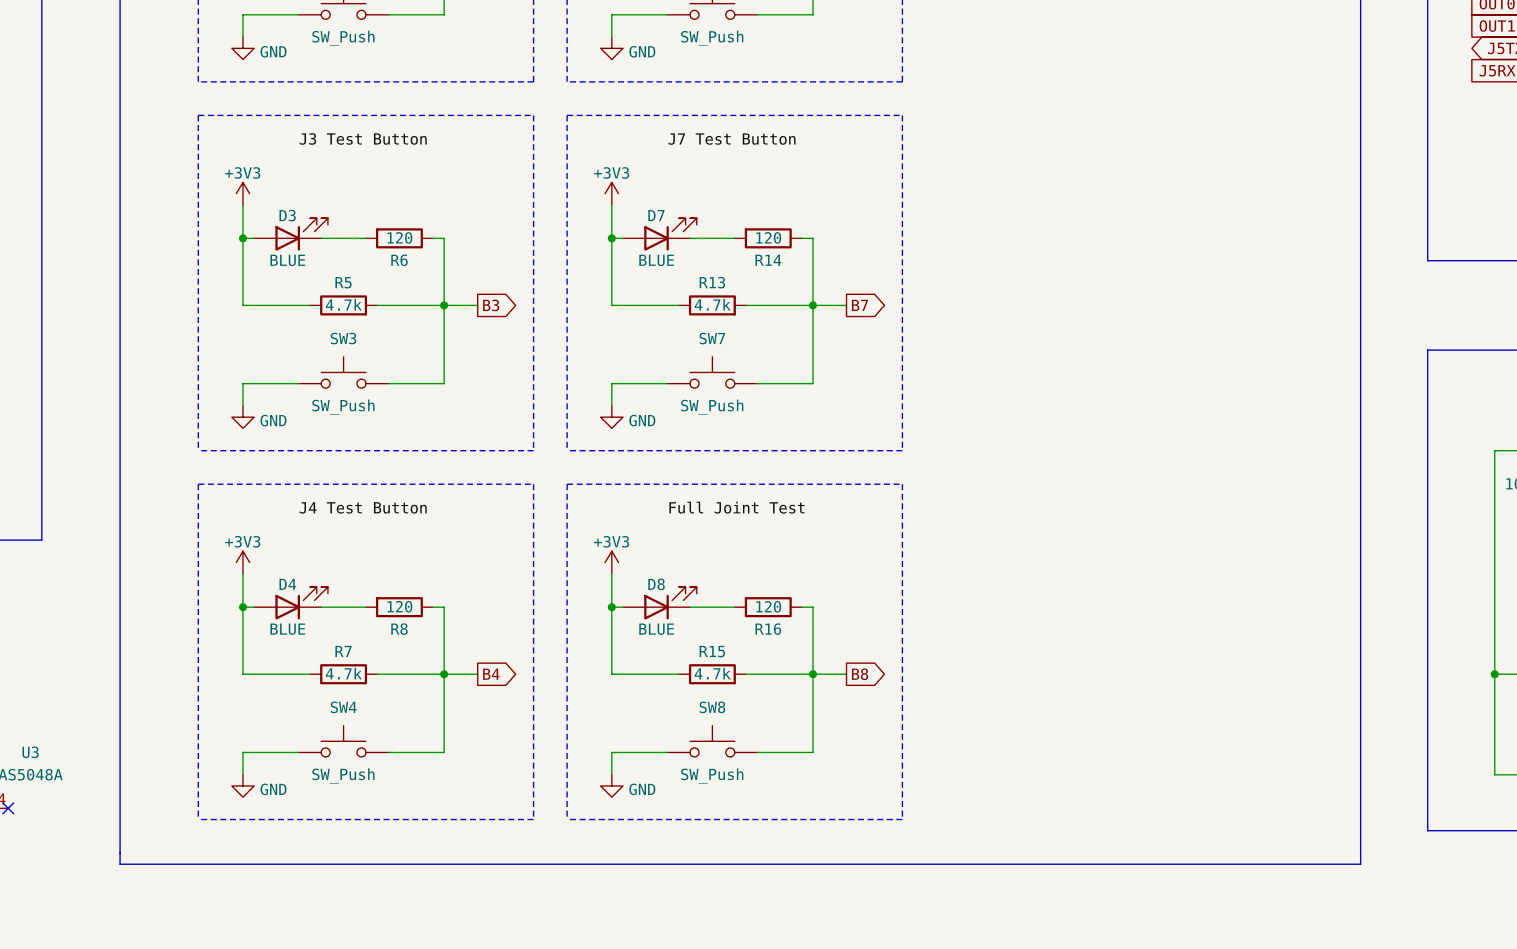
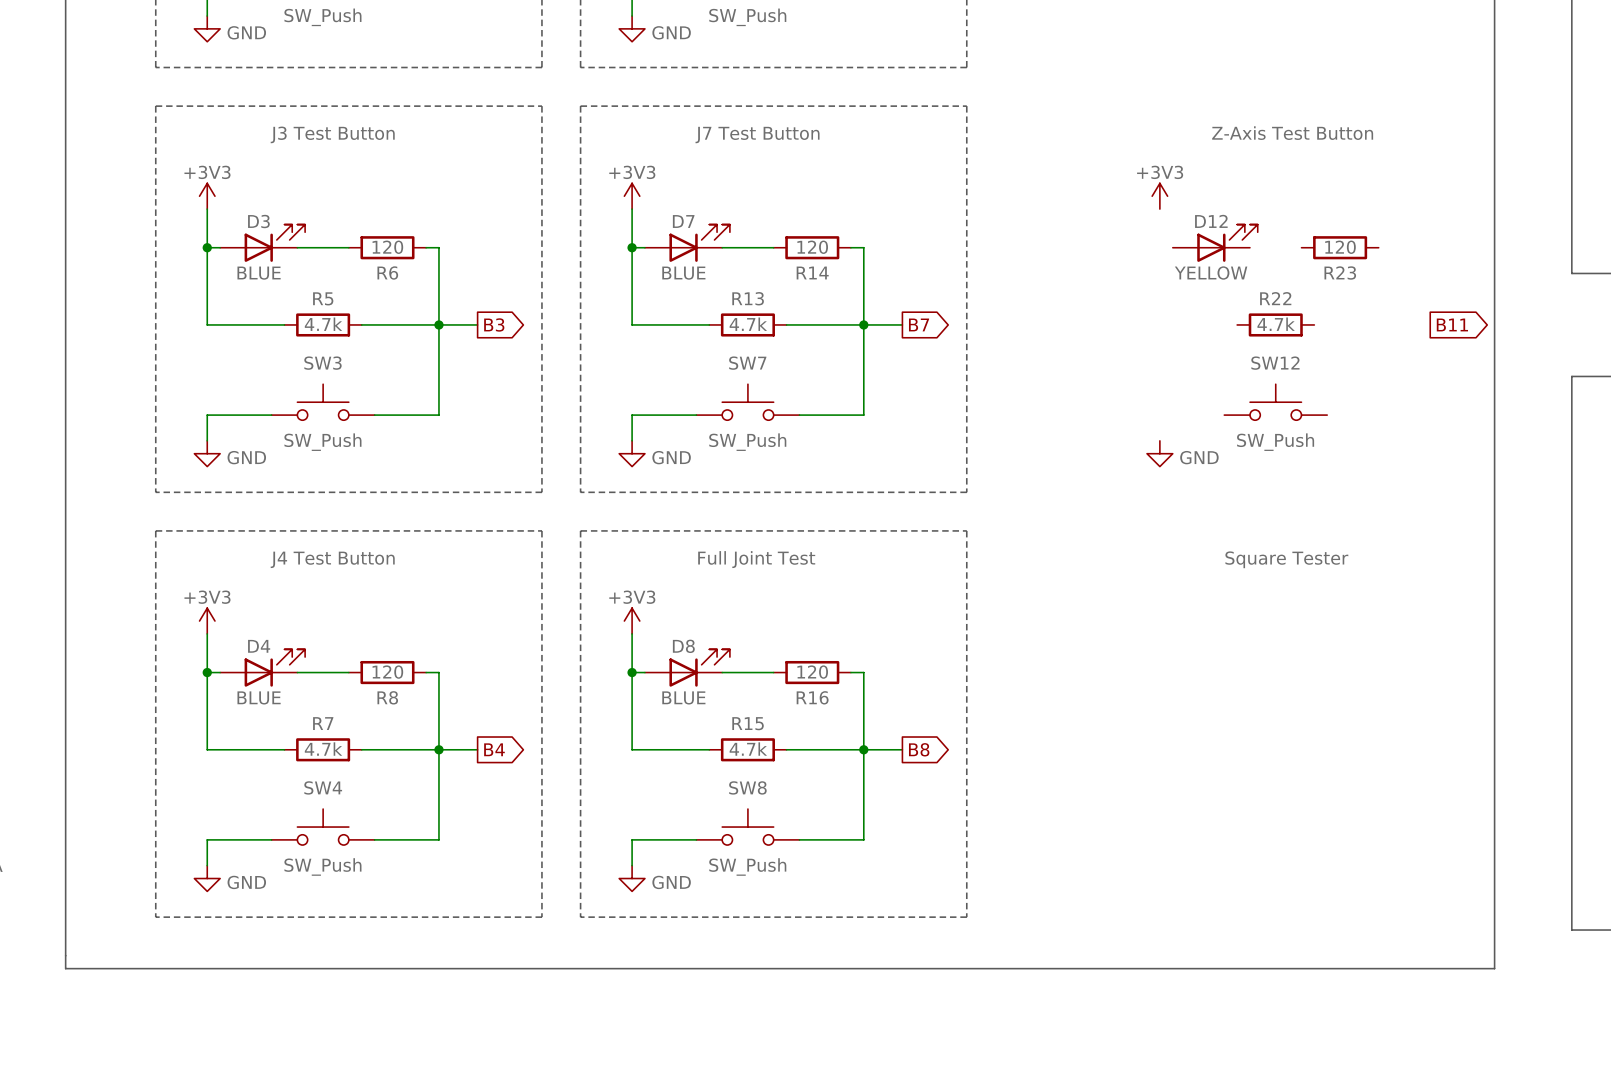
label: none -> Z-Axis Test Button (1292, 133)
power symbol: none -> +3V3 (1159, 196)
D12: none -> YELLOW (1215, 243)
R23: none -> 120 (1340, 247)
R22: none -> 4.7k (1275, 324)
global label: none -> B11 (1452, 324)
SW12: none -> SW_Push (1275, 402)
power symbol: none -> GND (1159, 453)
label: none -> Square Tester (1286, 559)

